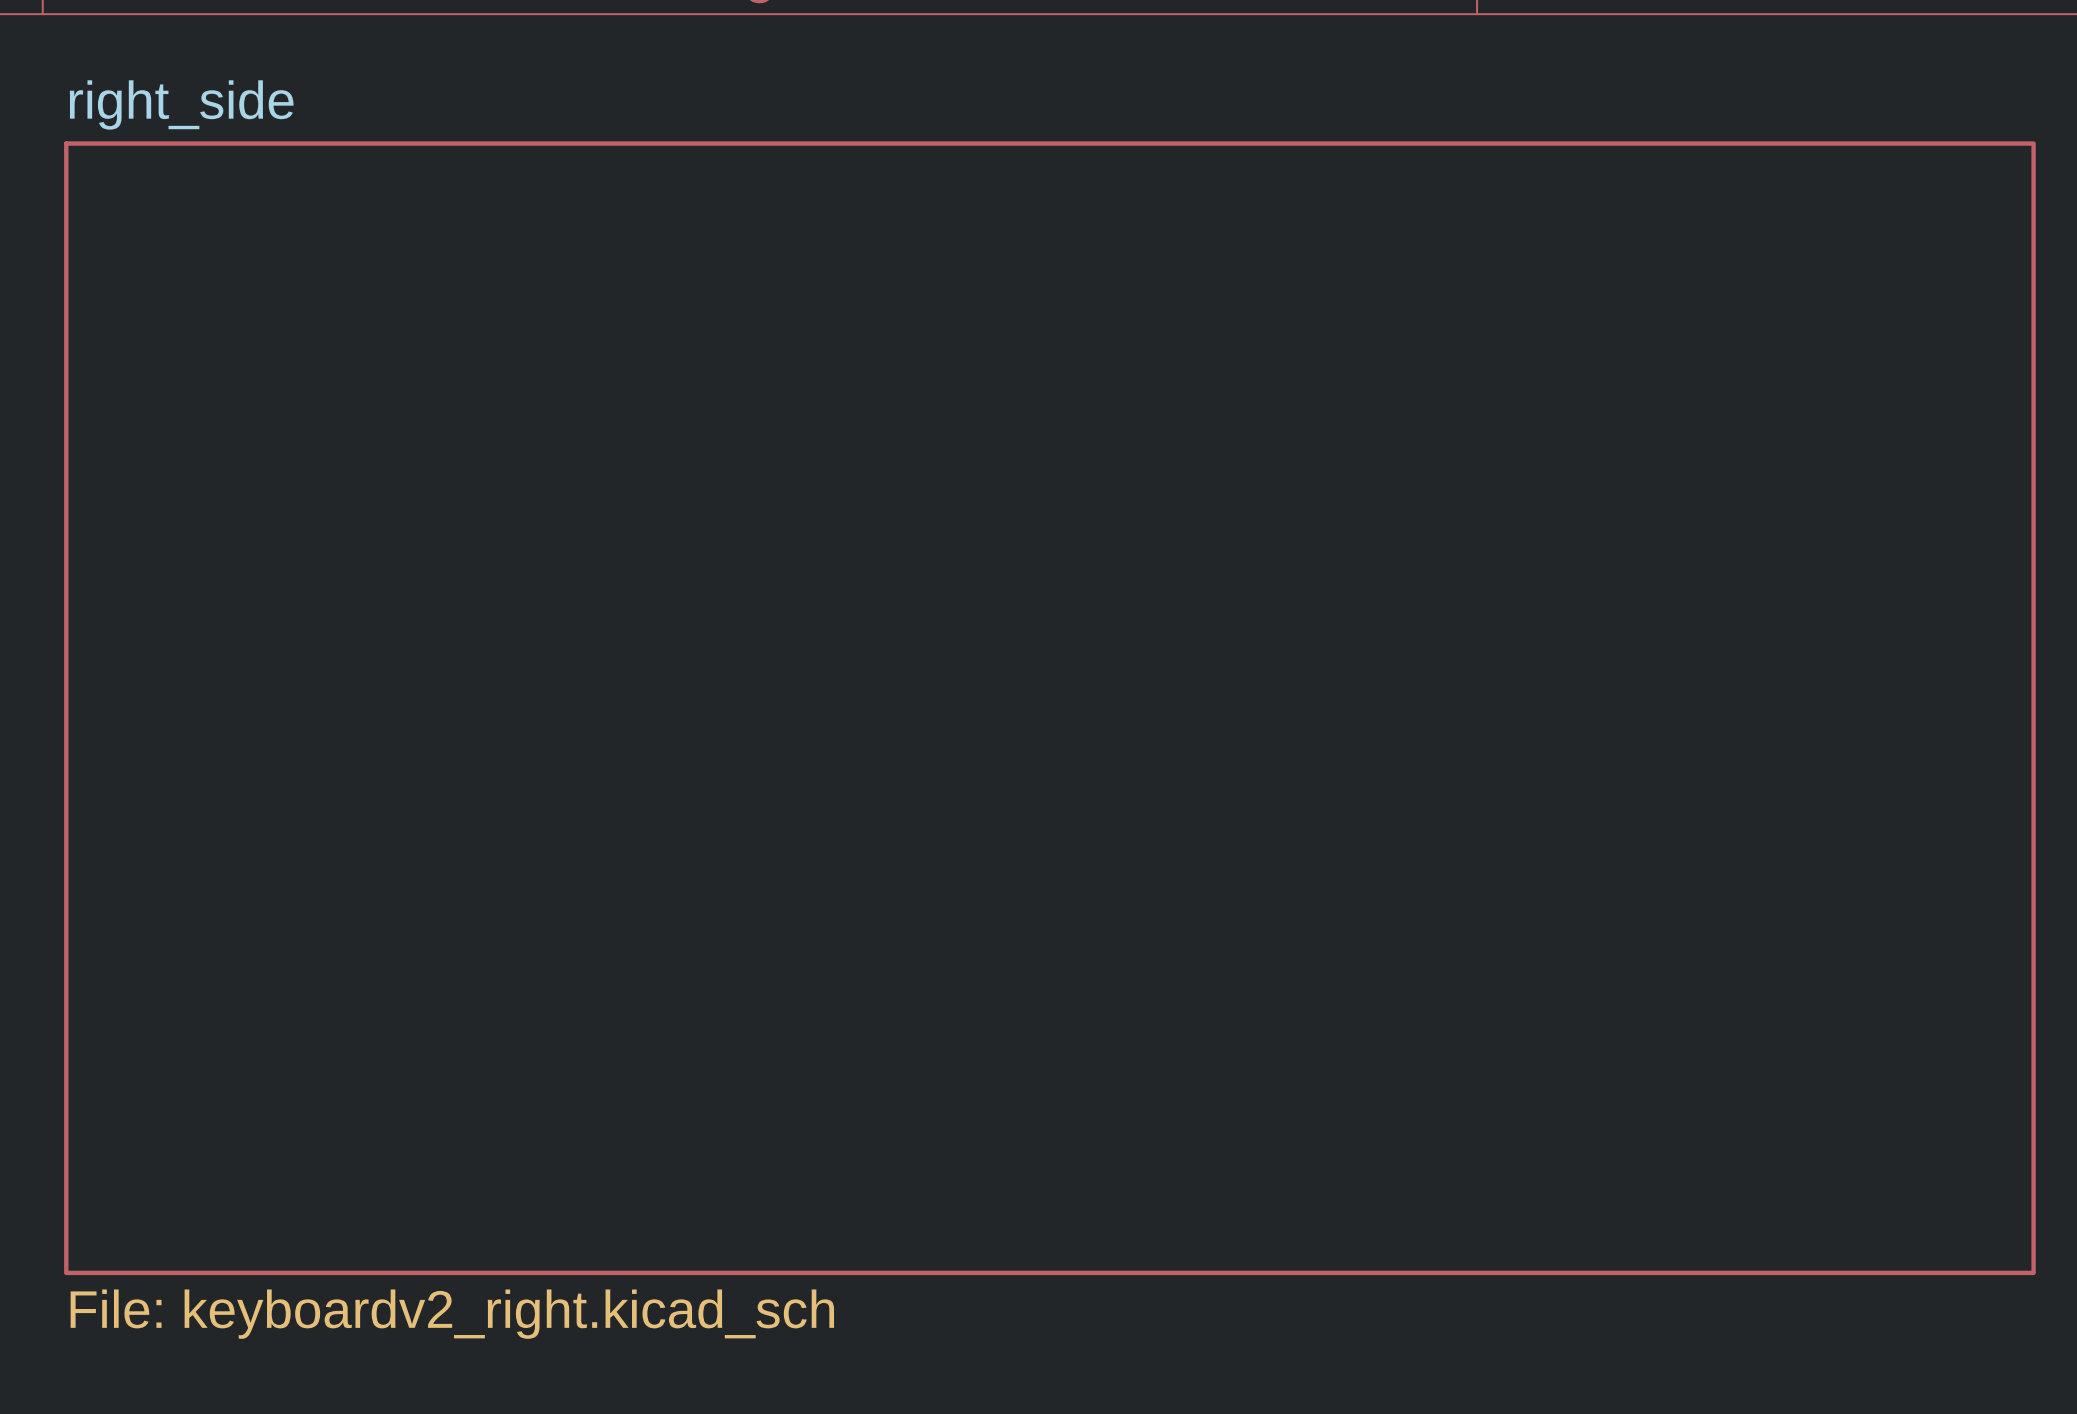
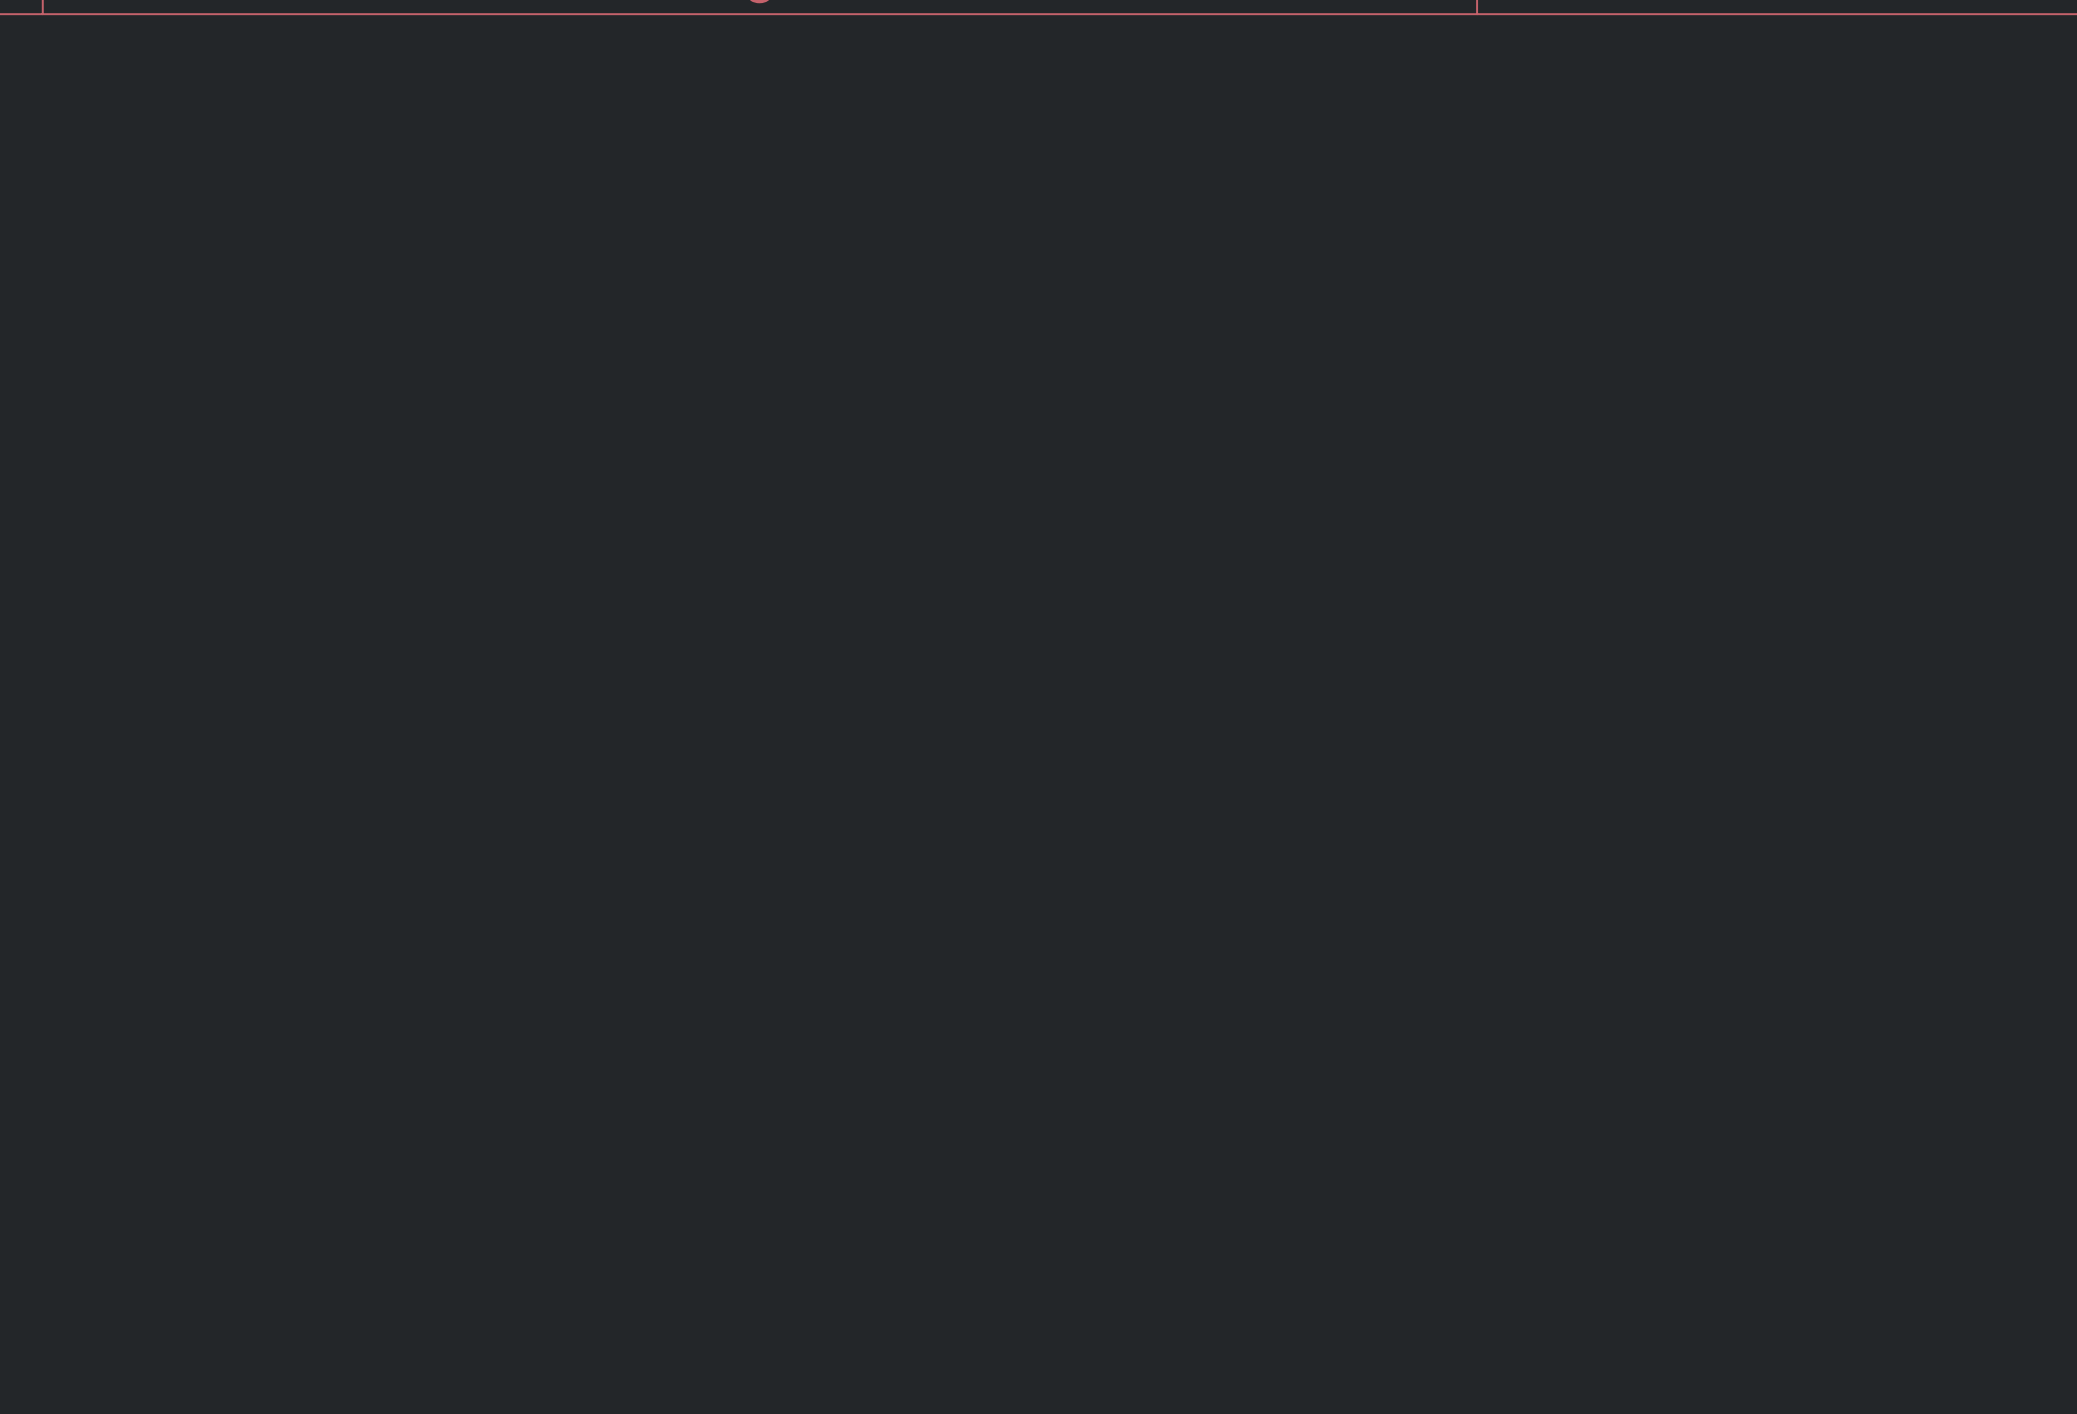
sheet right_side: File: keyboardv2_right.kicad_sch (1049, 708) -> none

